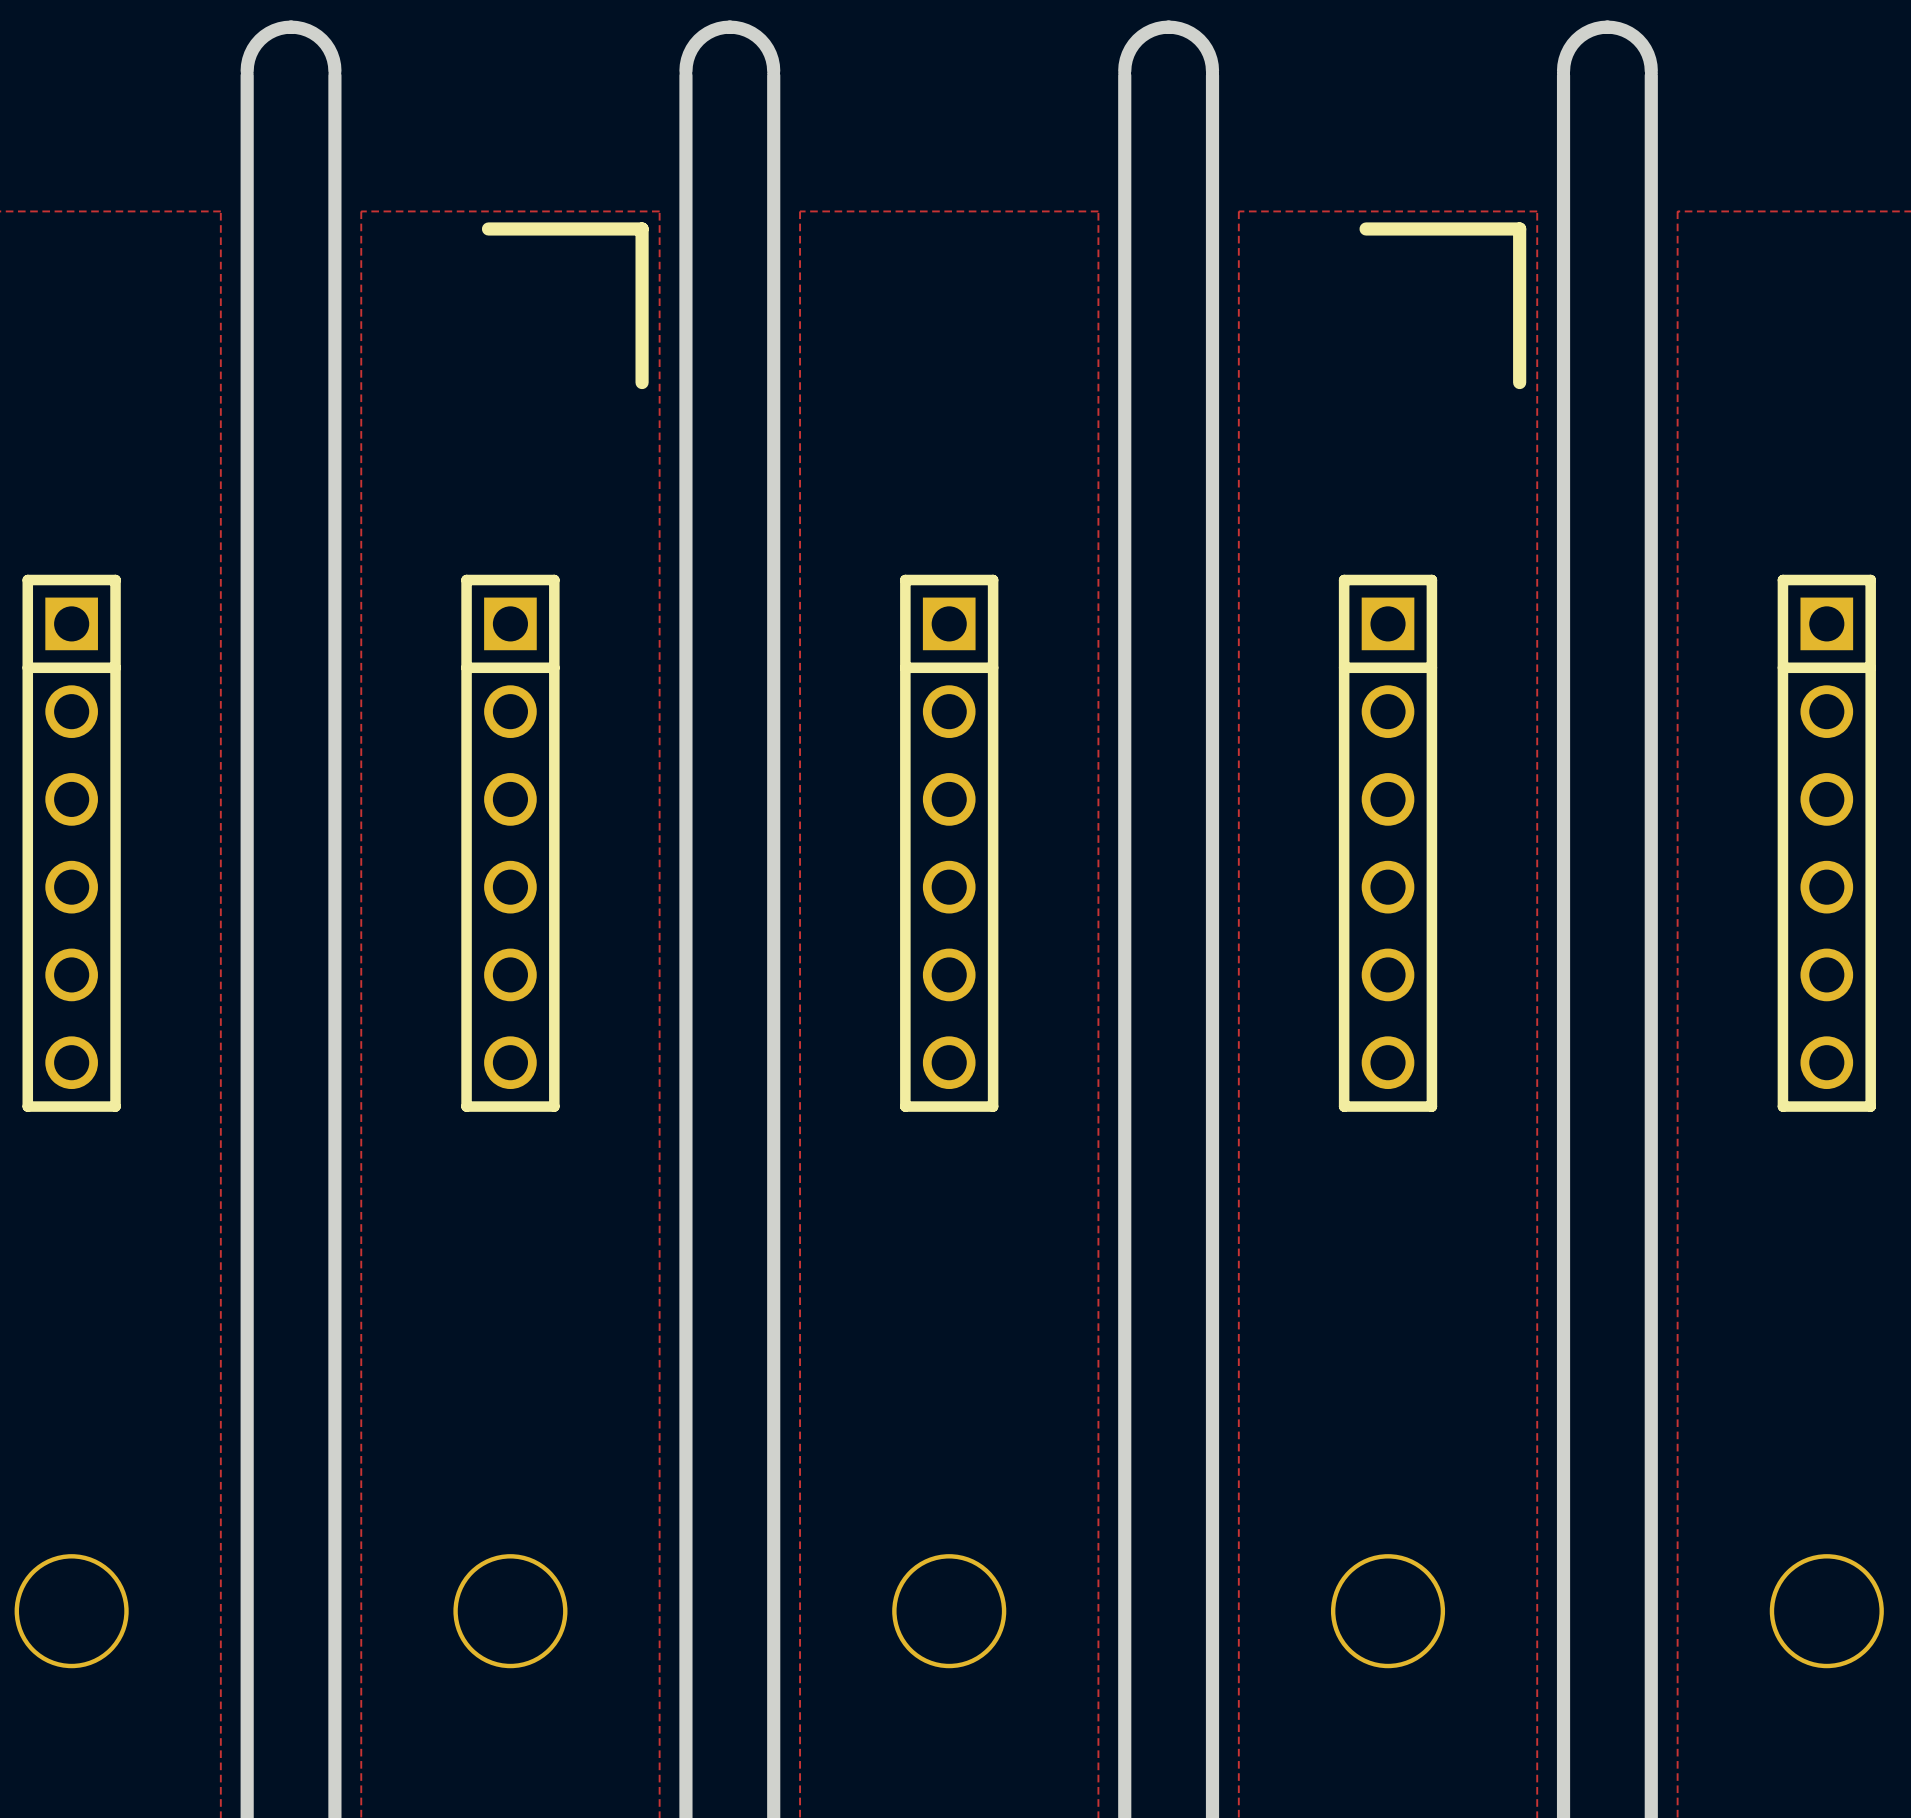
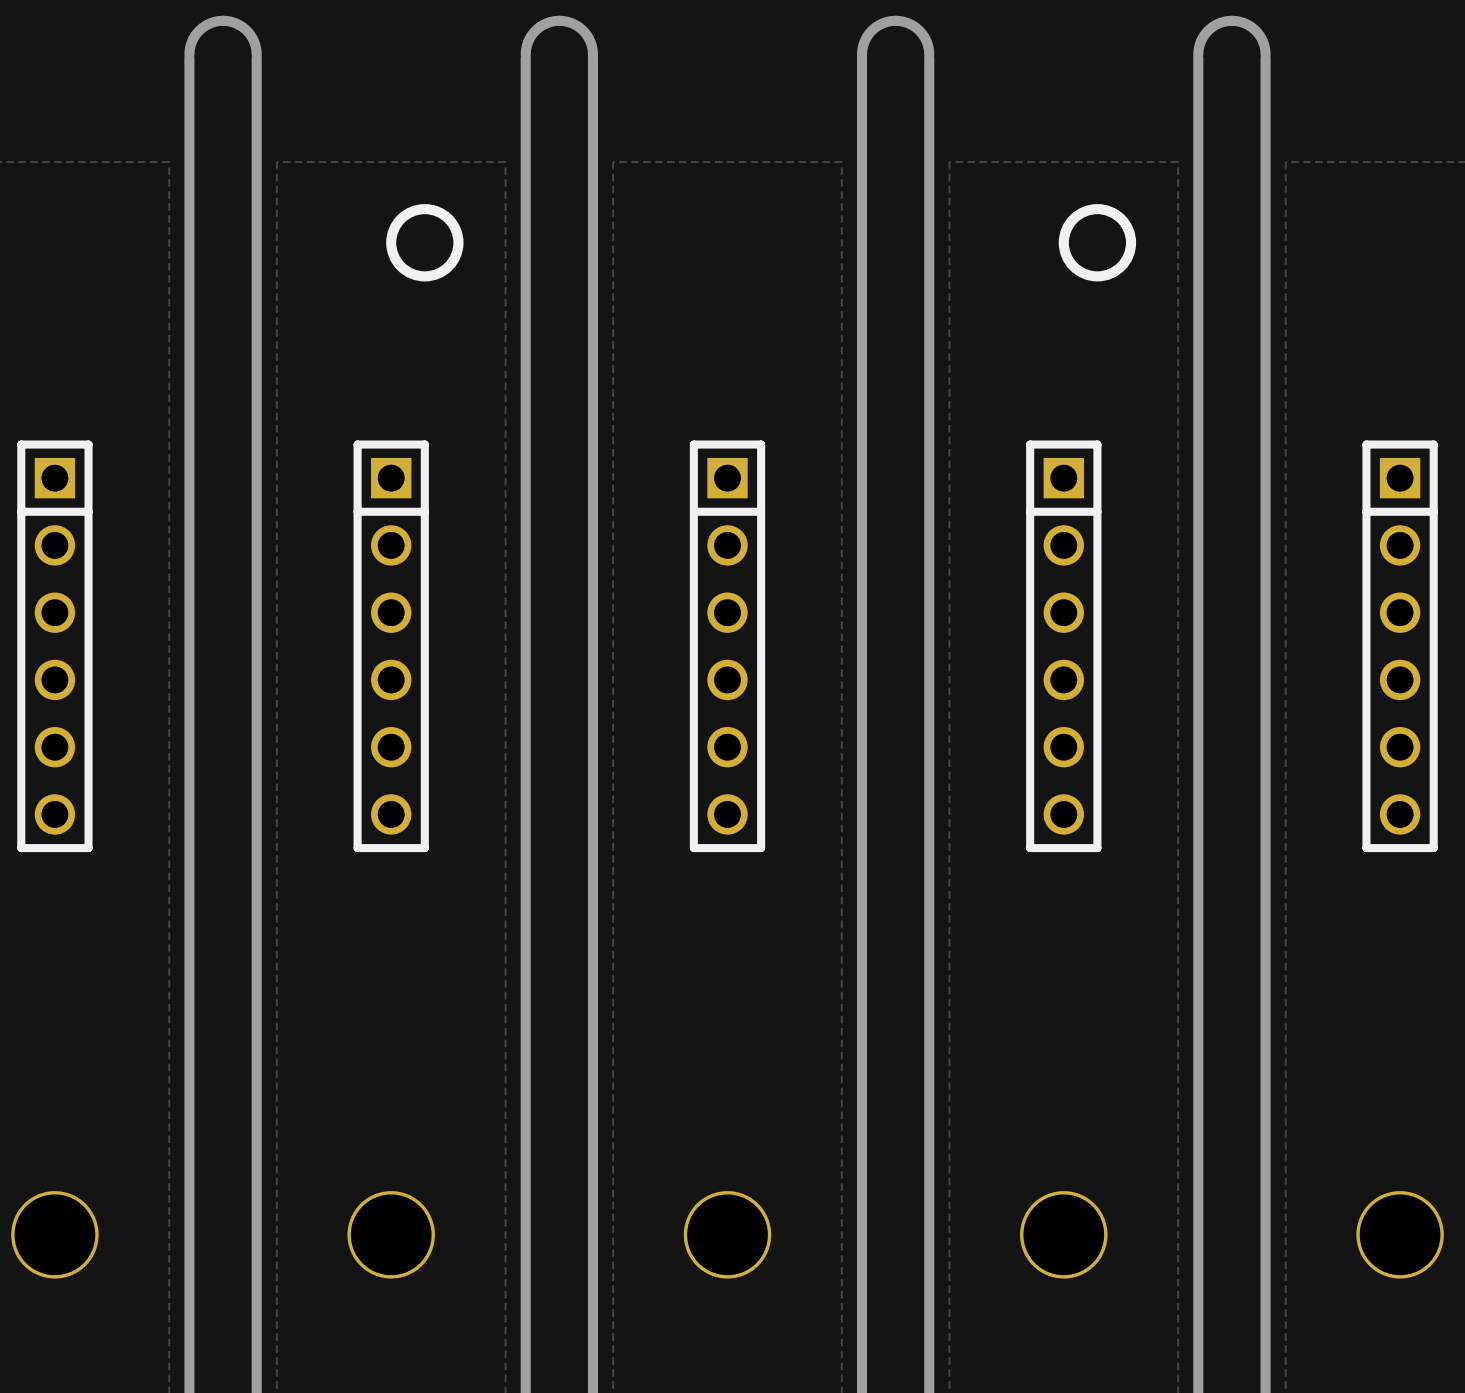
line: (488, 228) (642, 228) (642, 382) -> none
line: (1366, 228) (1519, 228) (1519, 382) -> none
drawing: none -> [386, 204, 464, 282]
drawing: none -> [1058, 204, 1137, 282]

